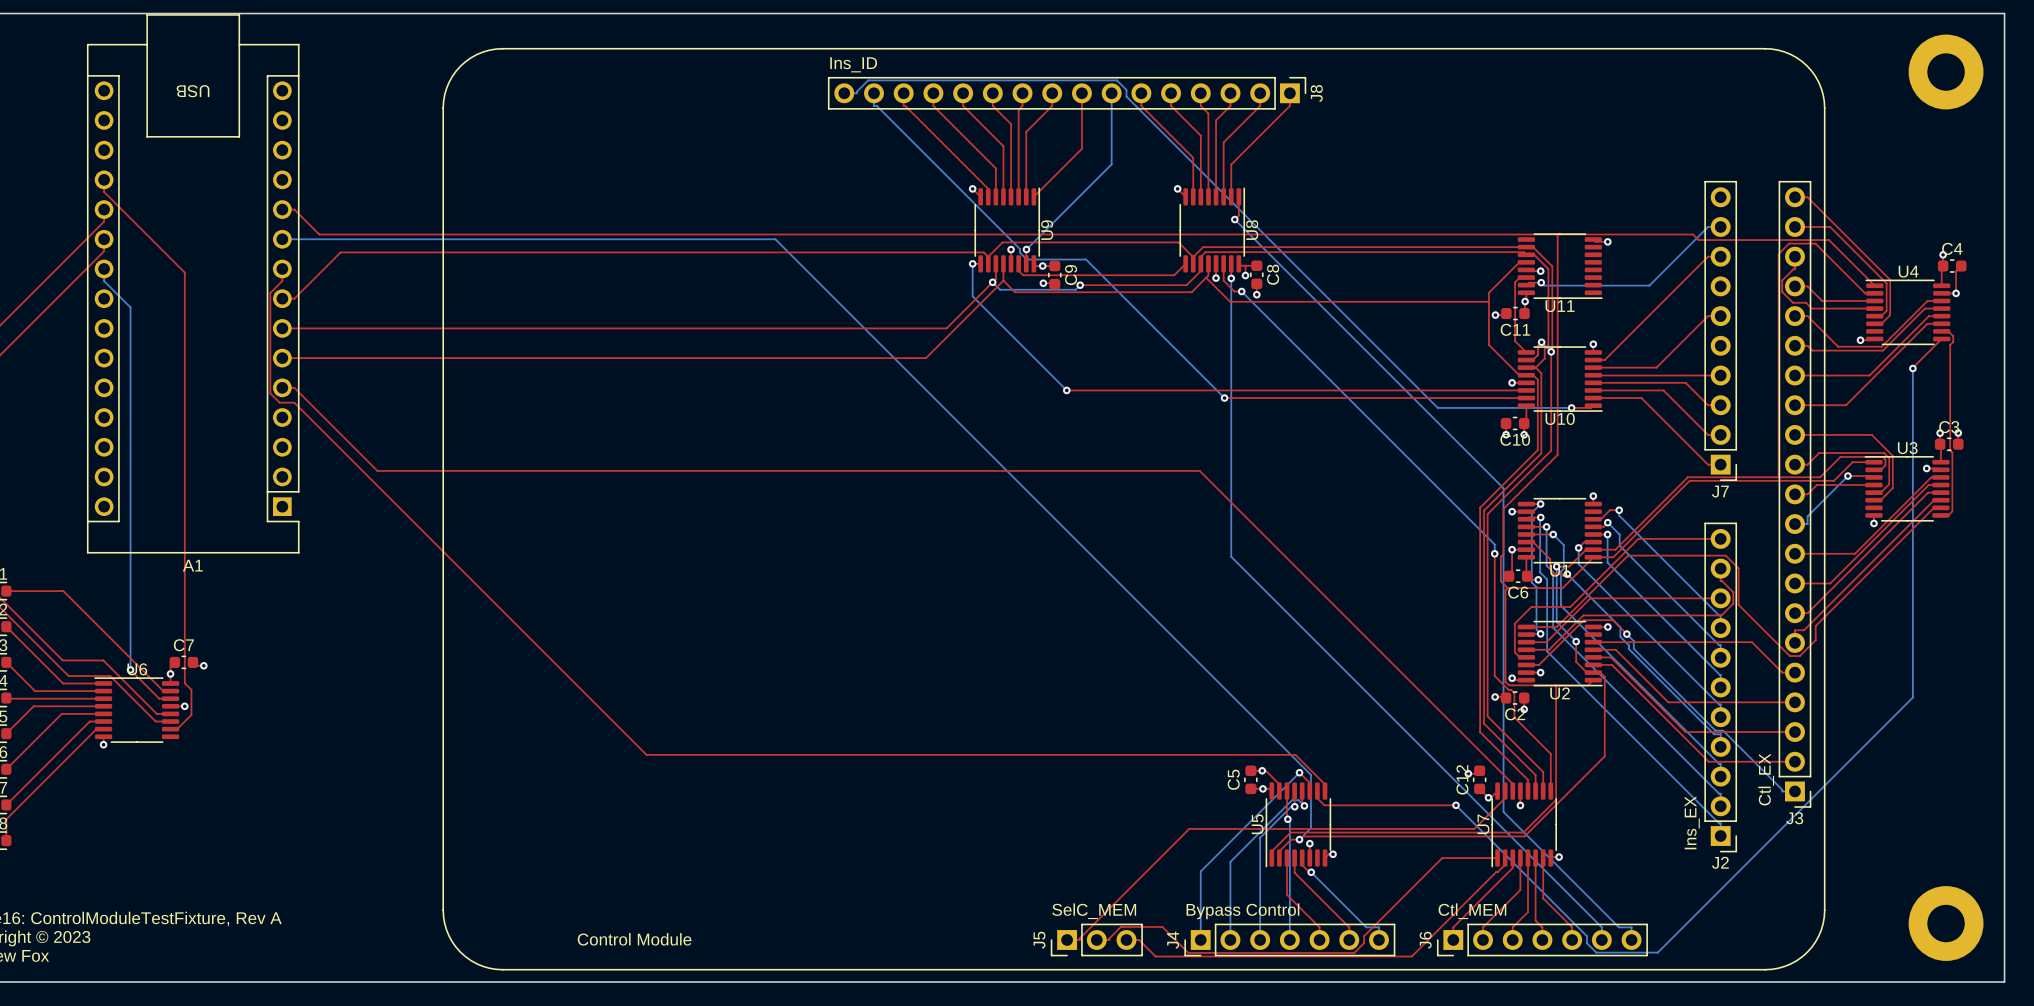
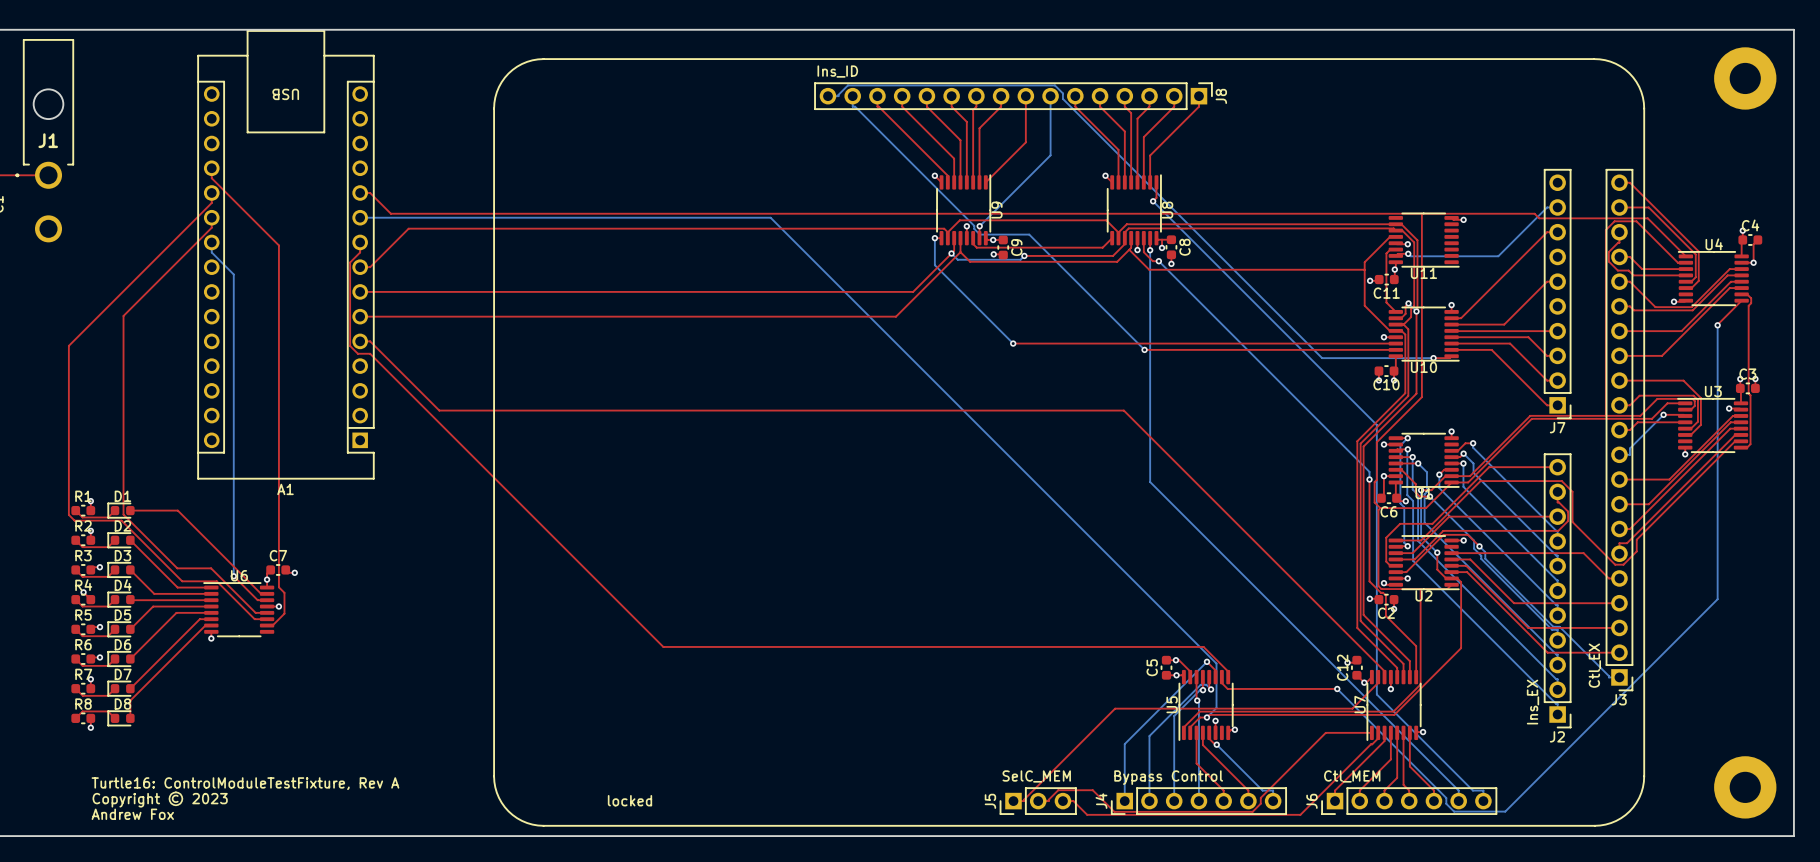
text: Control Module (634, 939) -> locked (629, 800)

